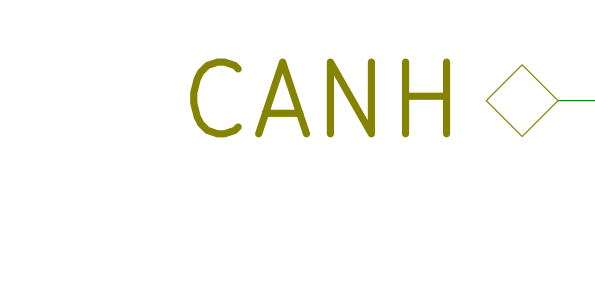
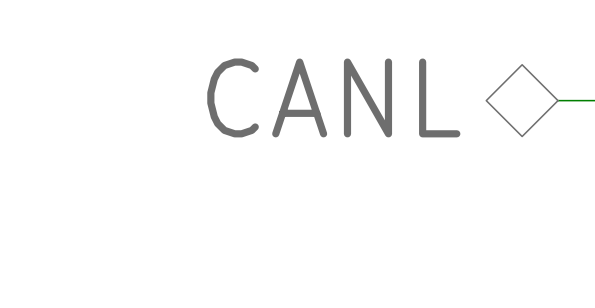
hierarchical label: CANH (320, 97) -> CANL (333, 97)

